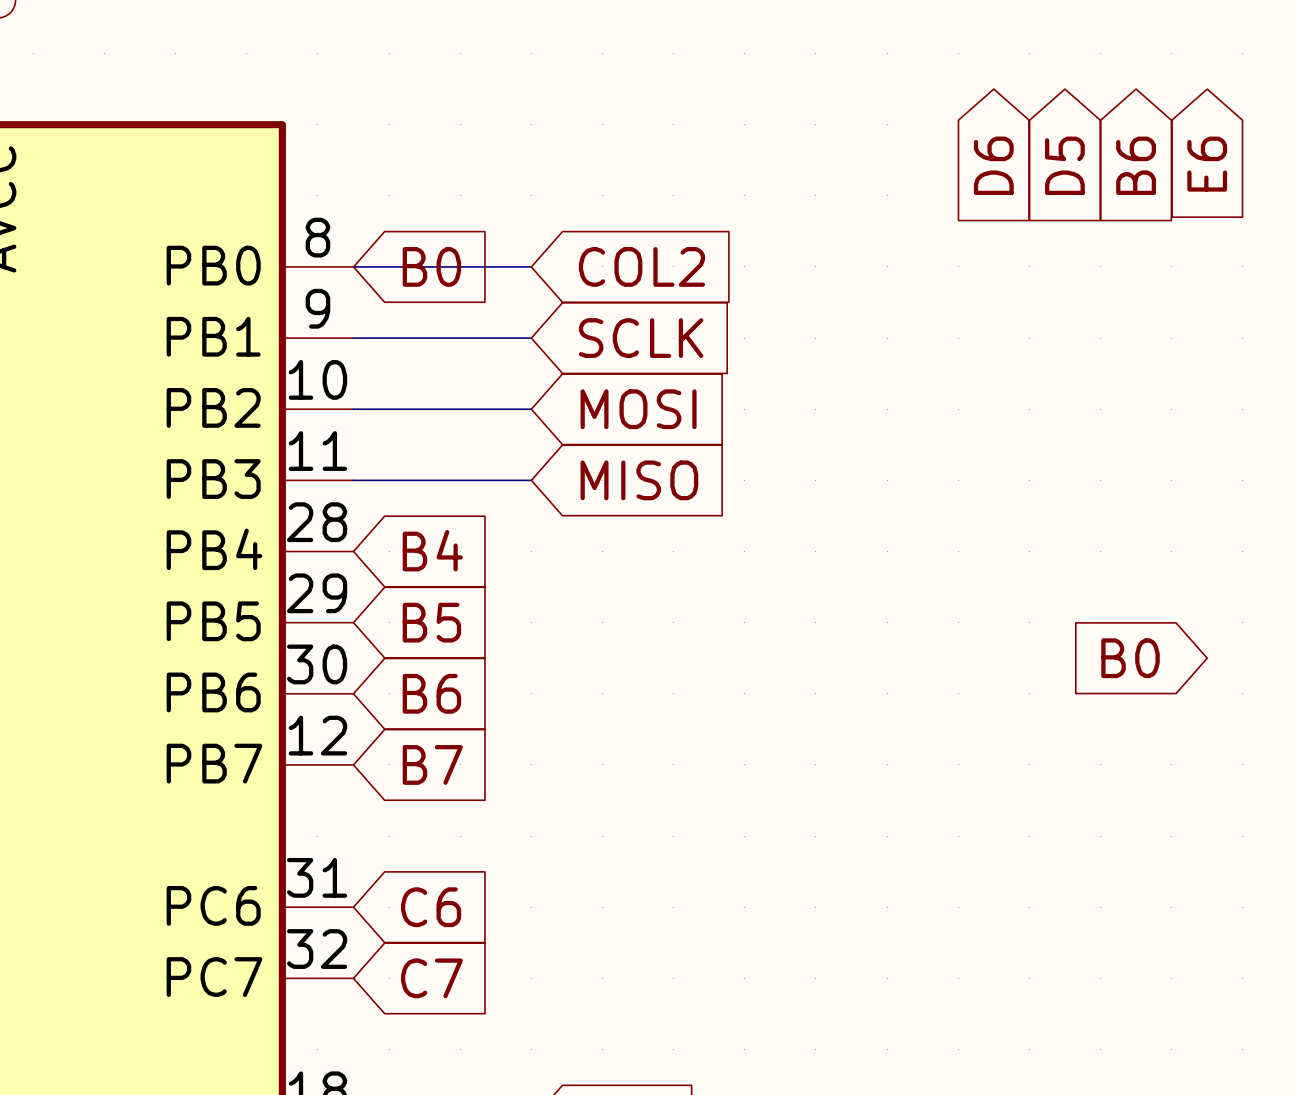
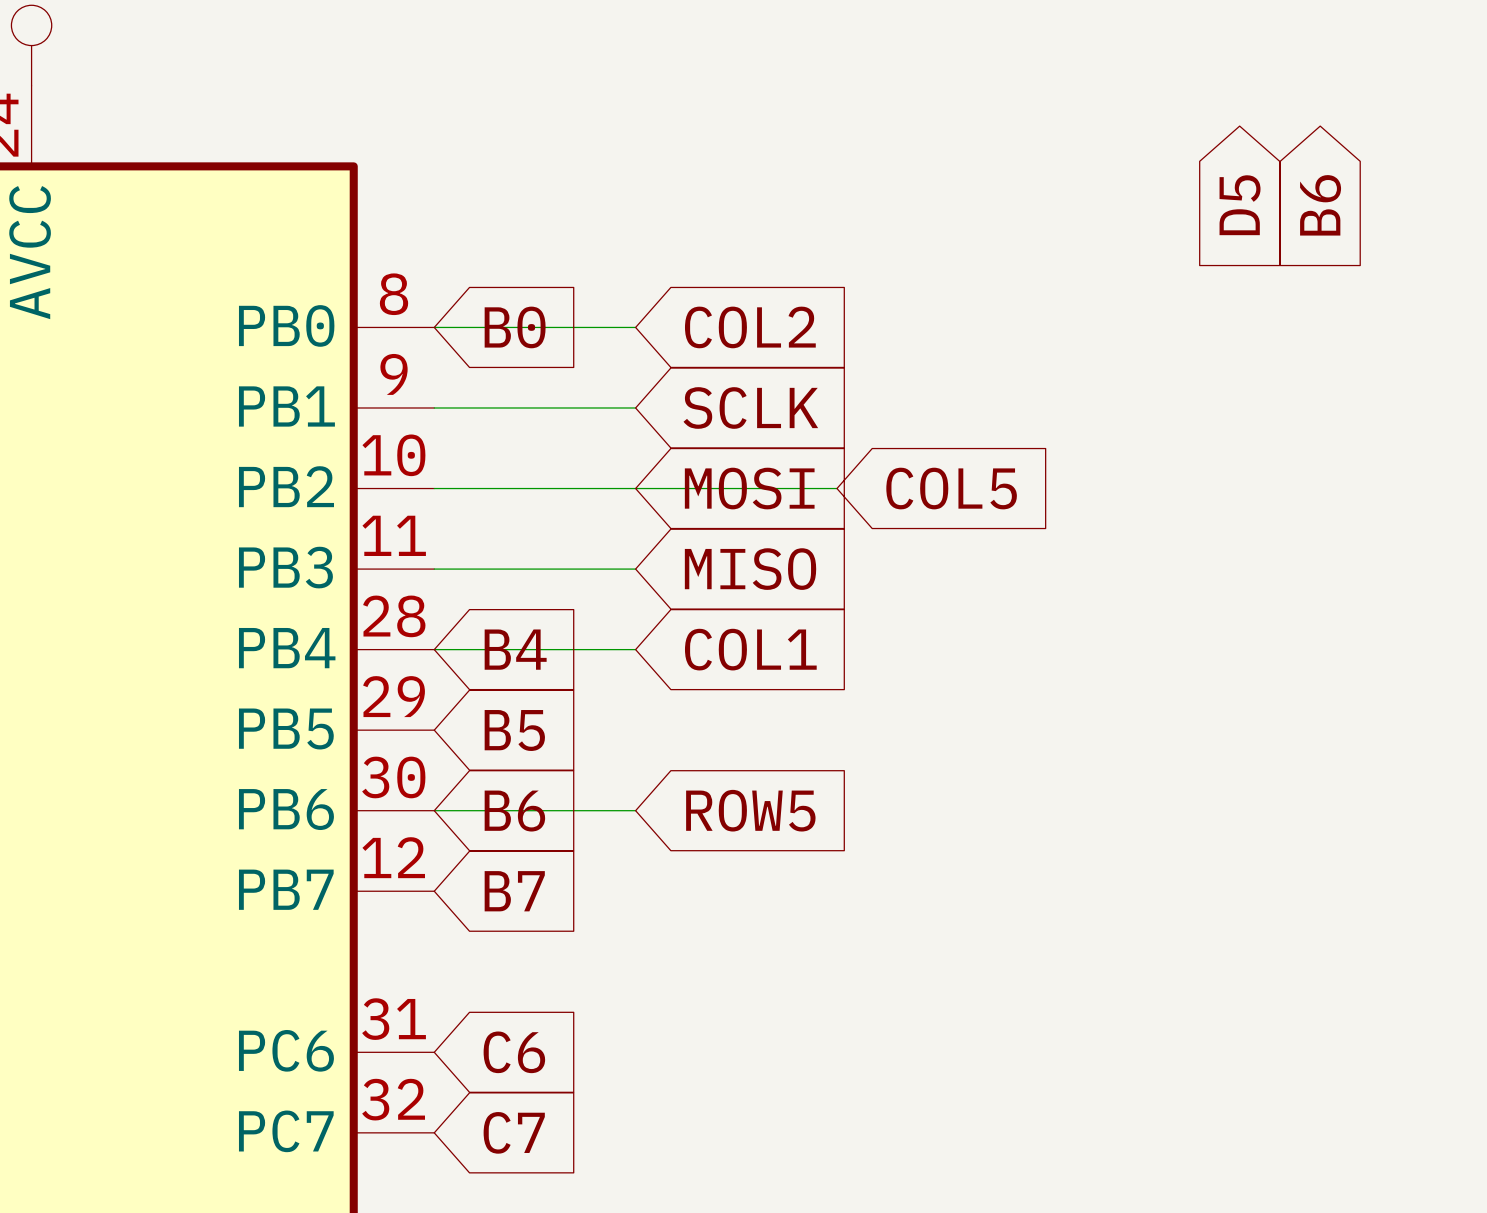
global label: E6 (1207, 164) -> none
global label: D6 (993, 165) -> none
wire: none -> (635, 488) (836, 488)
global label: none -> COL5 (951, 488)
wire: none -> (434, 649) (635, 649)
global label: none -> COL1 (750, 649)
global label: B0 (1130, 658) -> none
wire: none -> (434, 810) (635, 810)
global label: none -> ROW5 (750, 810)

